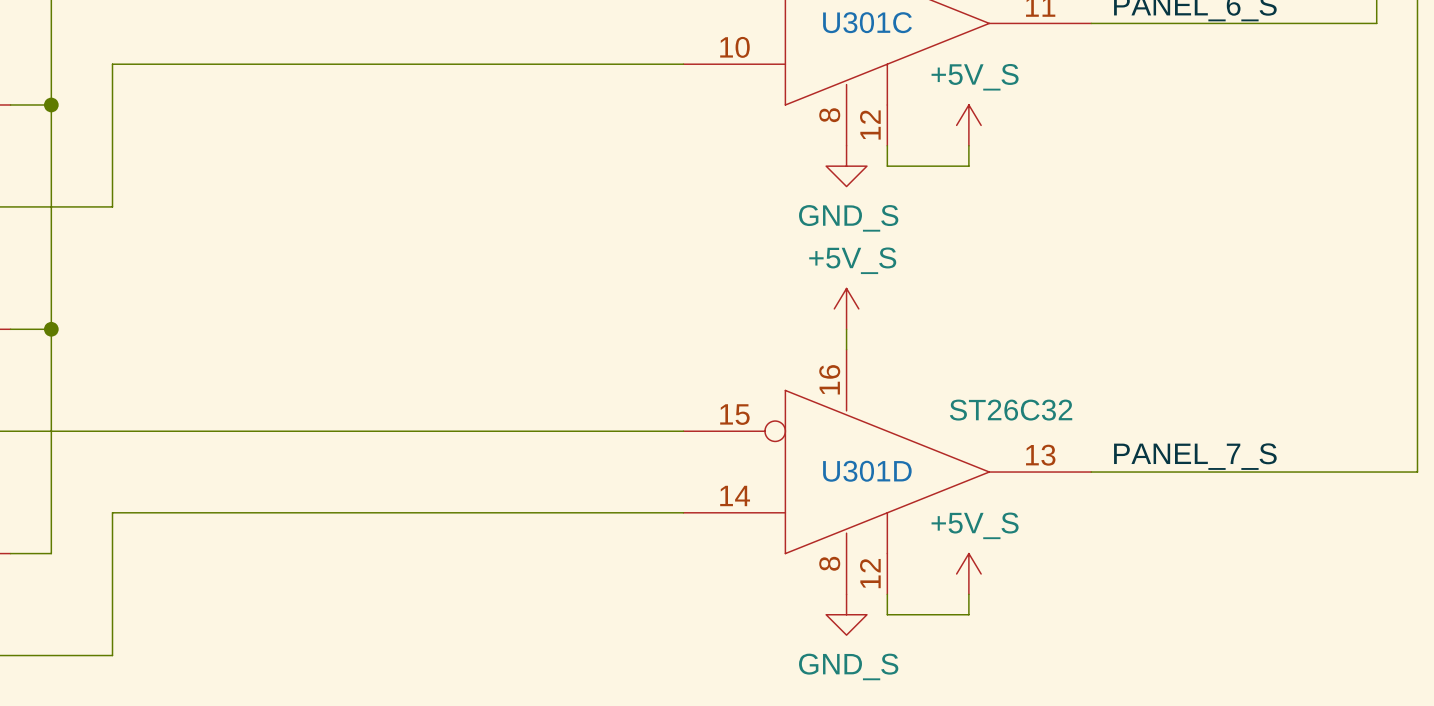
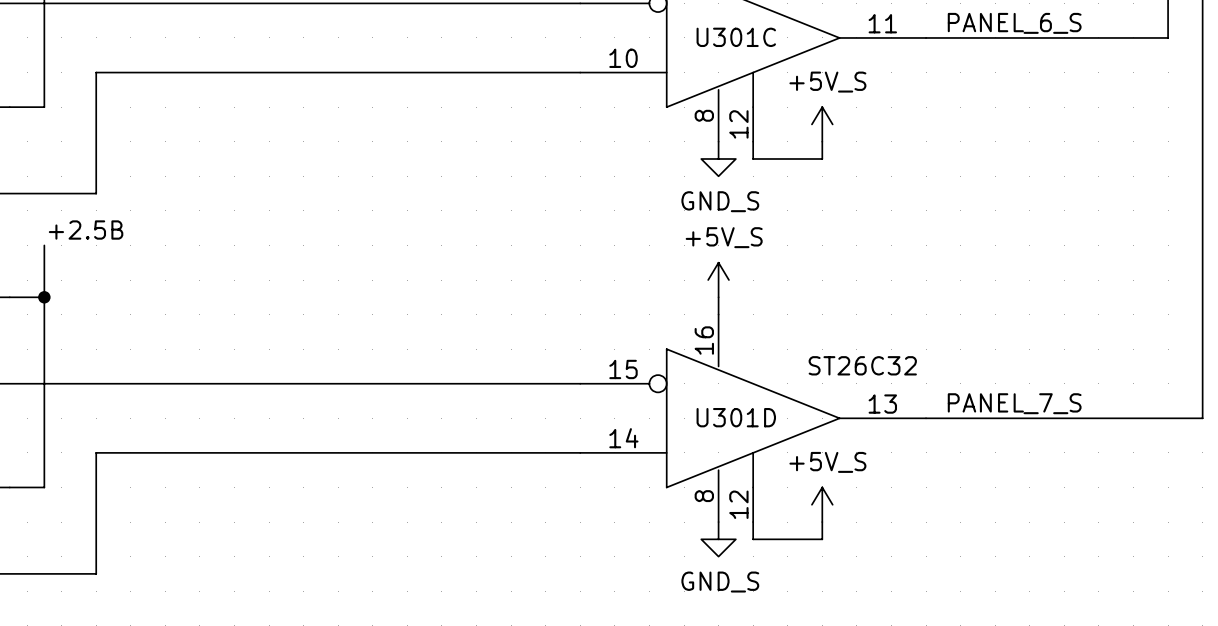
wire: (51, 104) (51, 268) -> none
junction: (51, 104) -> none
label: none -> +2.5B (86, 230)

